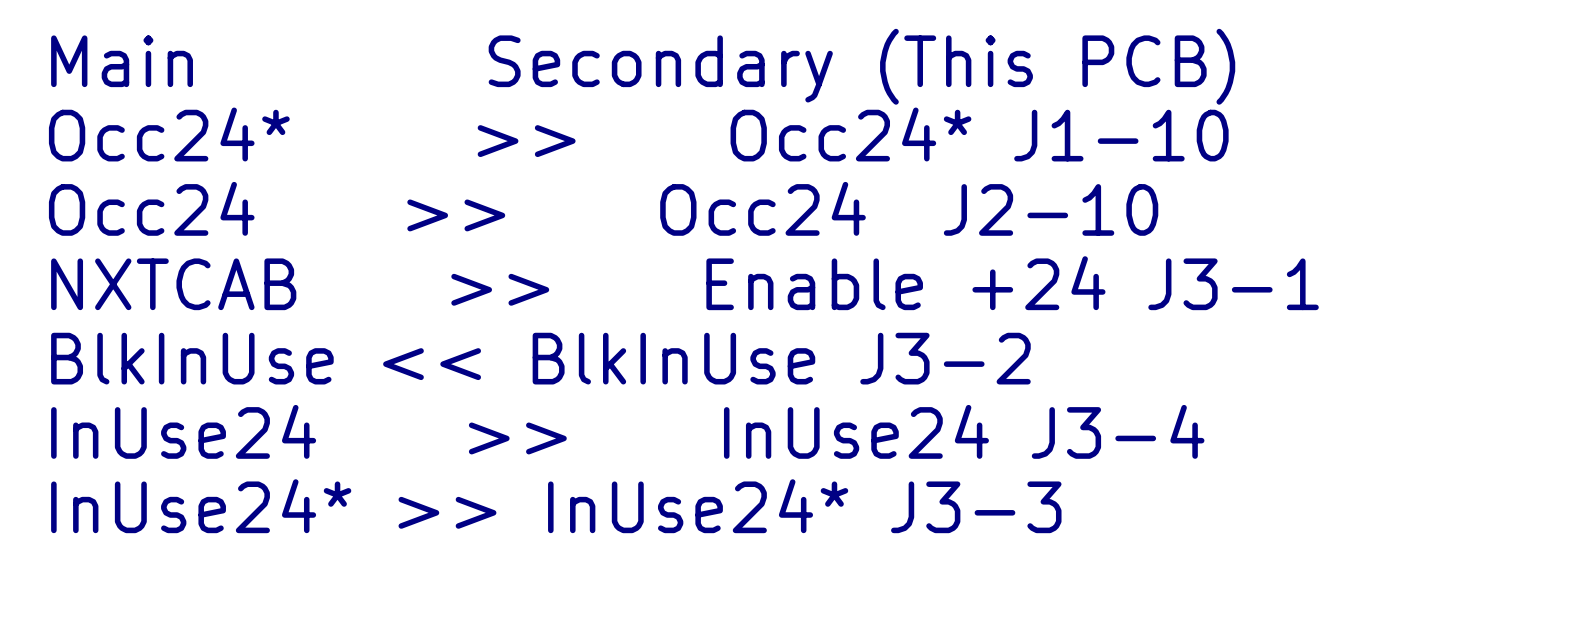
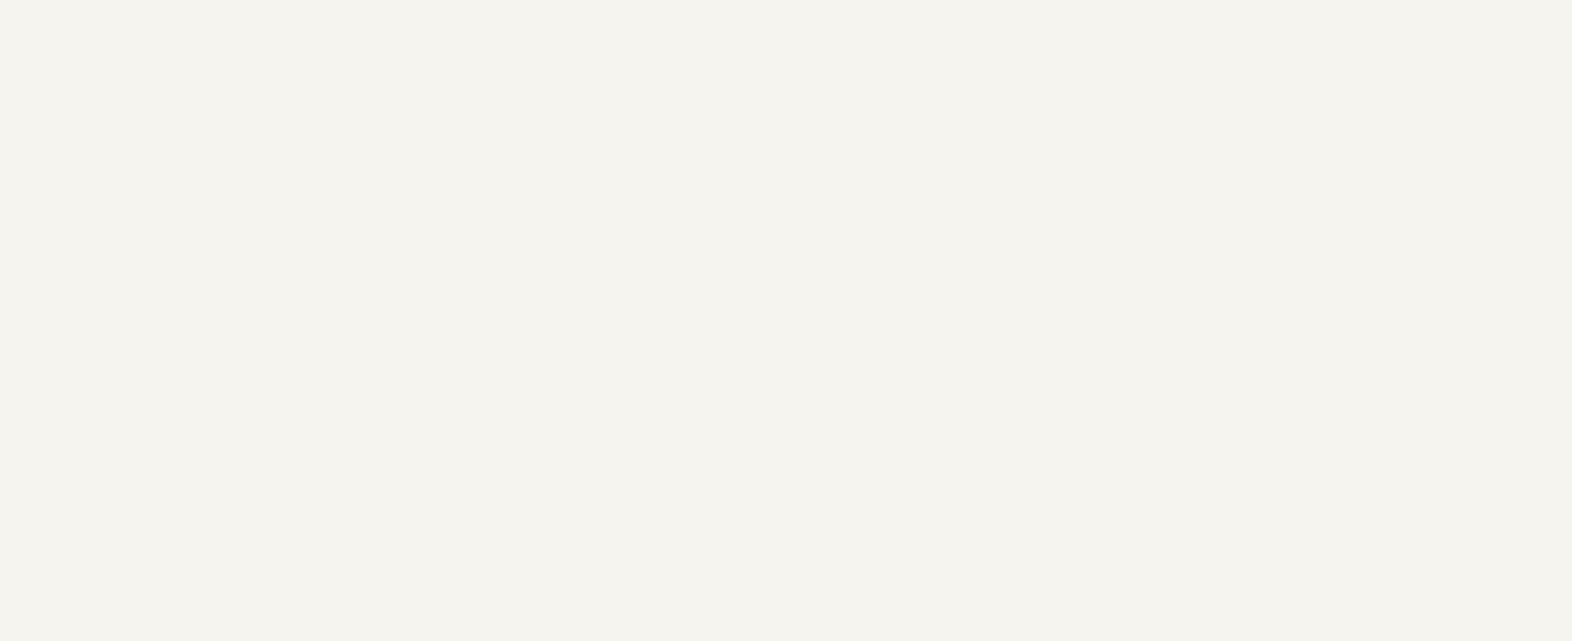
text: Main Secondary (This PCB) (643, 66) -> none
text: Occ24* >> Occ24* J1-10 (638, 134) -> none
text: Occ24 >> Occ24 J2-10 (603, 208) -> none
text: NXTCAB >> Enable +24 J3-1 (684, 283) -> none
text: BlkInUse << BlkInUse J3-2 (540, 358) -> none
text: InUse24 >> InUse24 J3-4 (627, 431) -> none
text: InUse24* >> InUse24* J3-3 (556, 506) -> none

